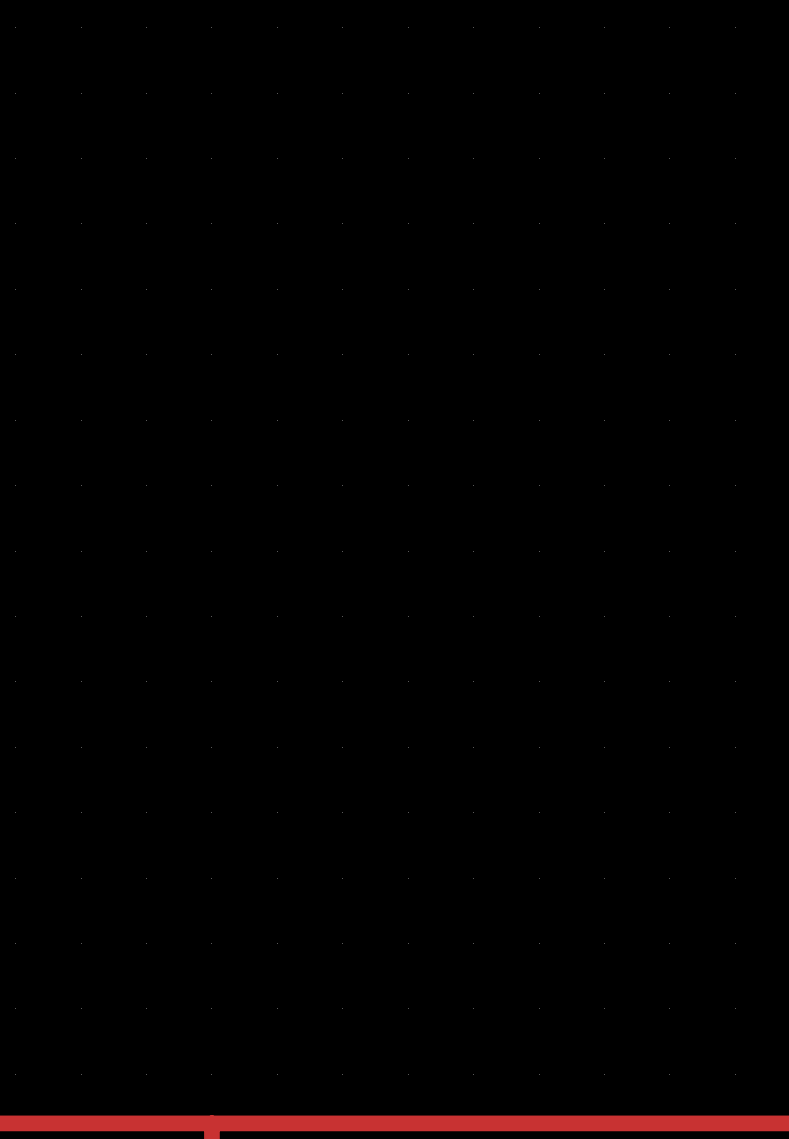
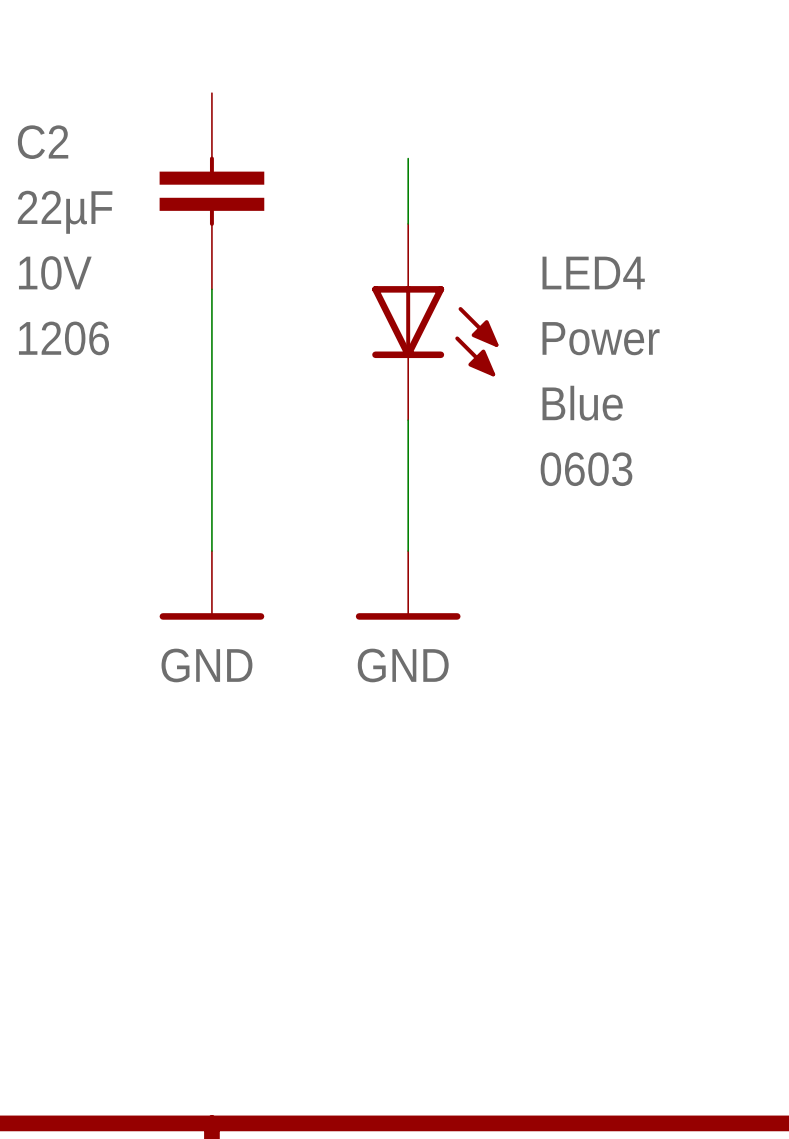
wire: none -> (408, 158) (408, 223)
C2: none -> 22µF (211, 191)
wire: none -> (211, 289) (211, 551)
LED4: none -> Power (435, 322)
wire: none -> (408, 420) (408, 551)
power symbol: none -> GND (211, 585)
power symbol: none -> GND (408, 585)

